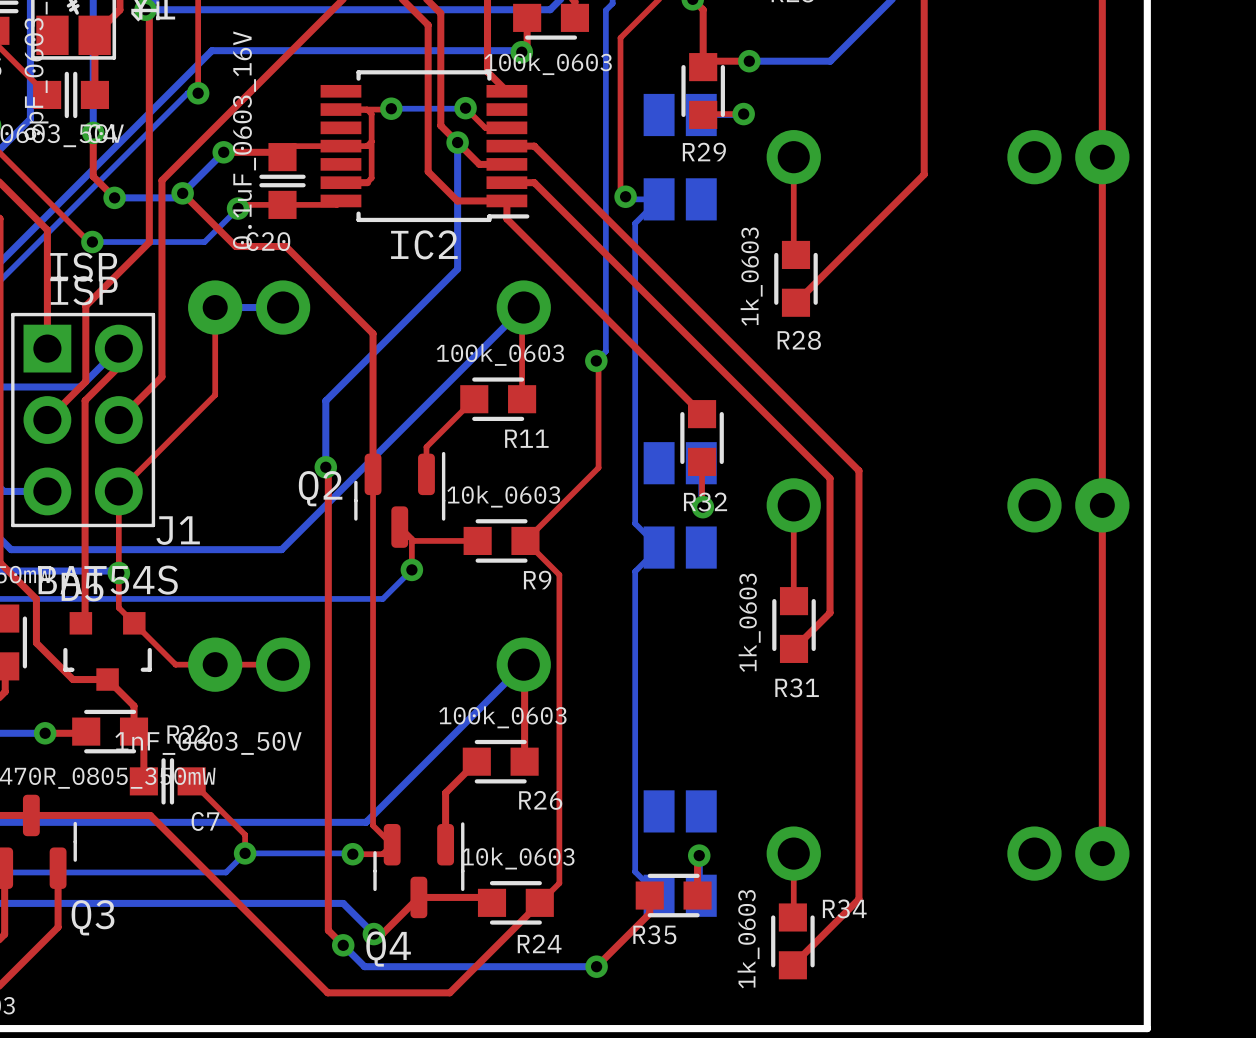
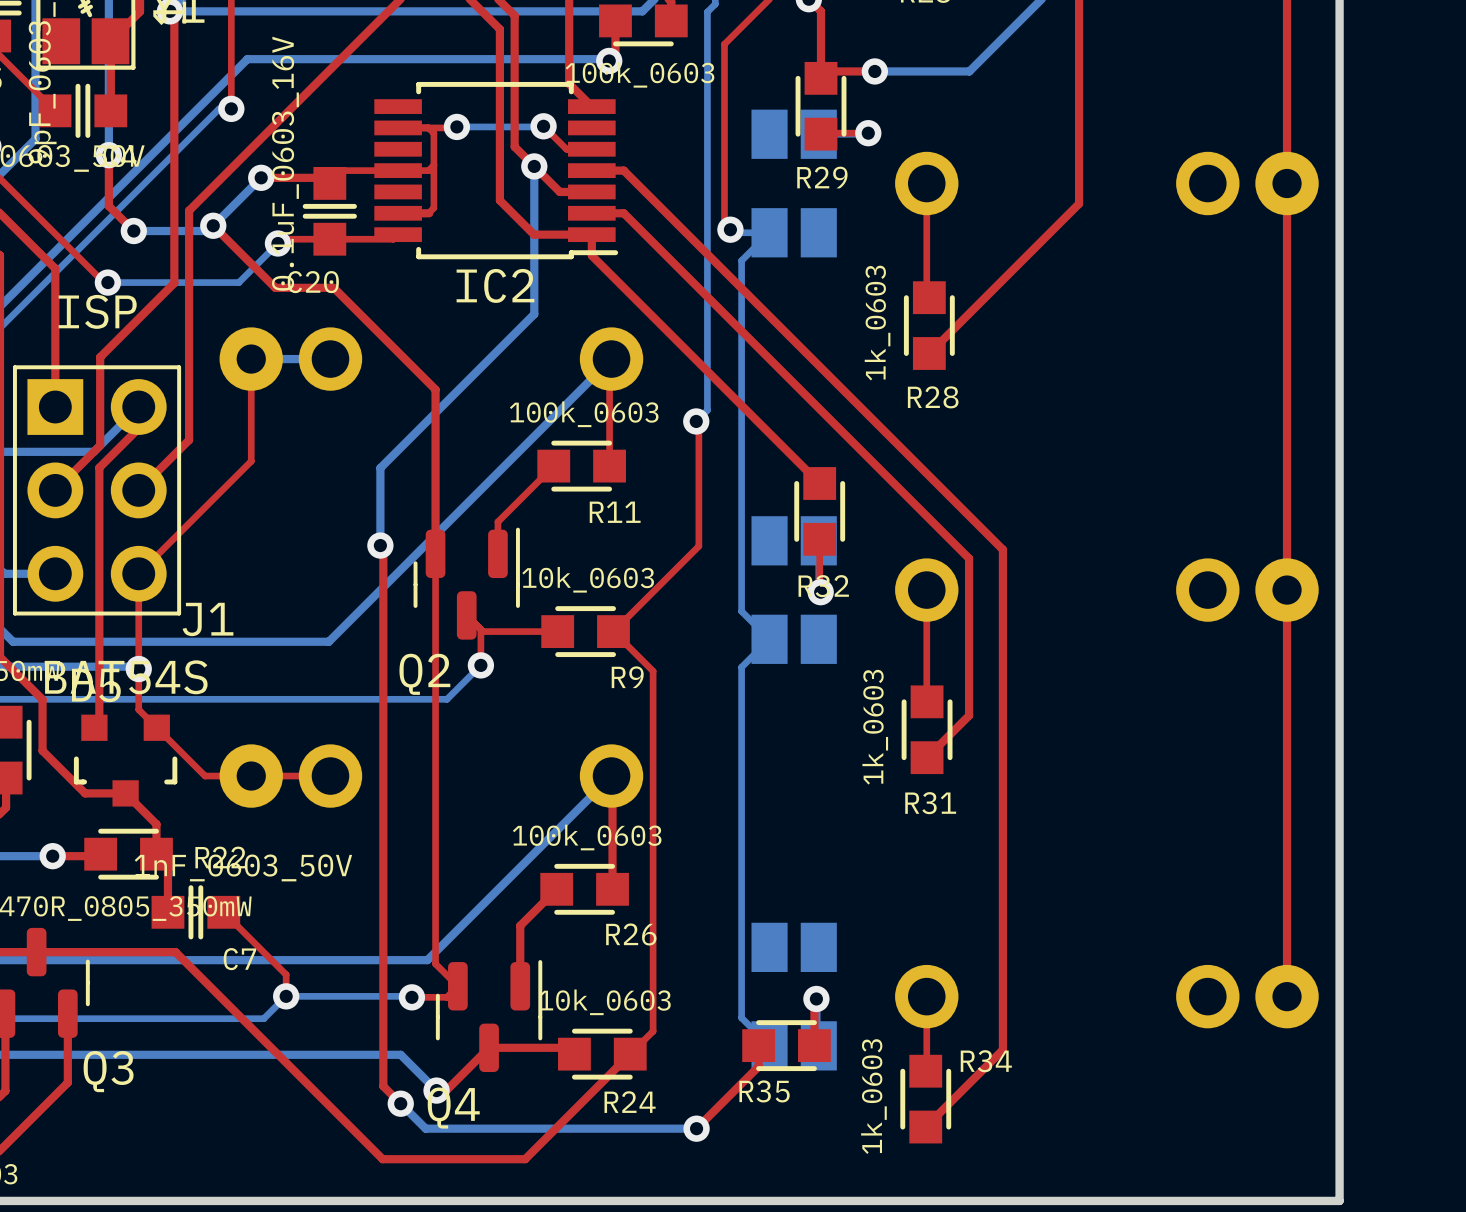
text: ISP (84, 290) -> none
Q2 name position: Q2 (320, 488) -> Q2 (424, 674)

